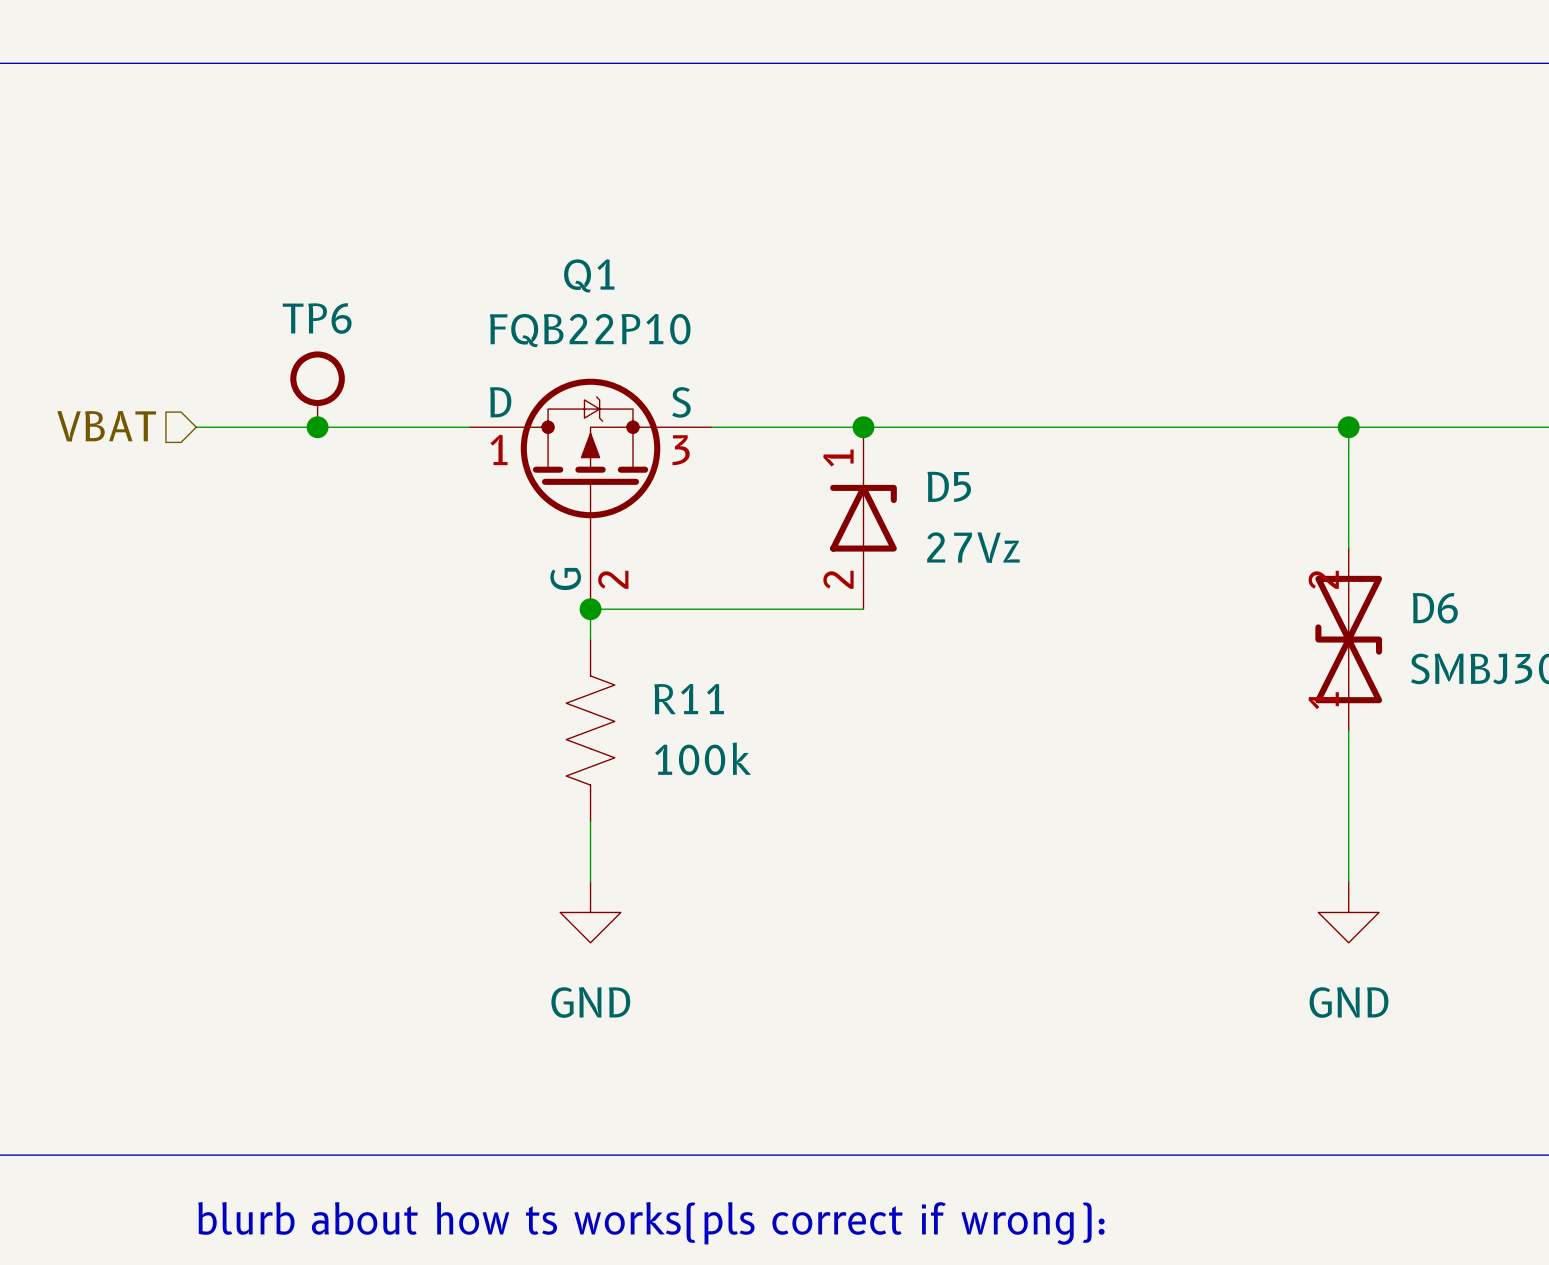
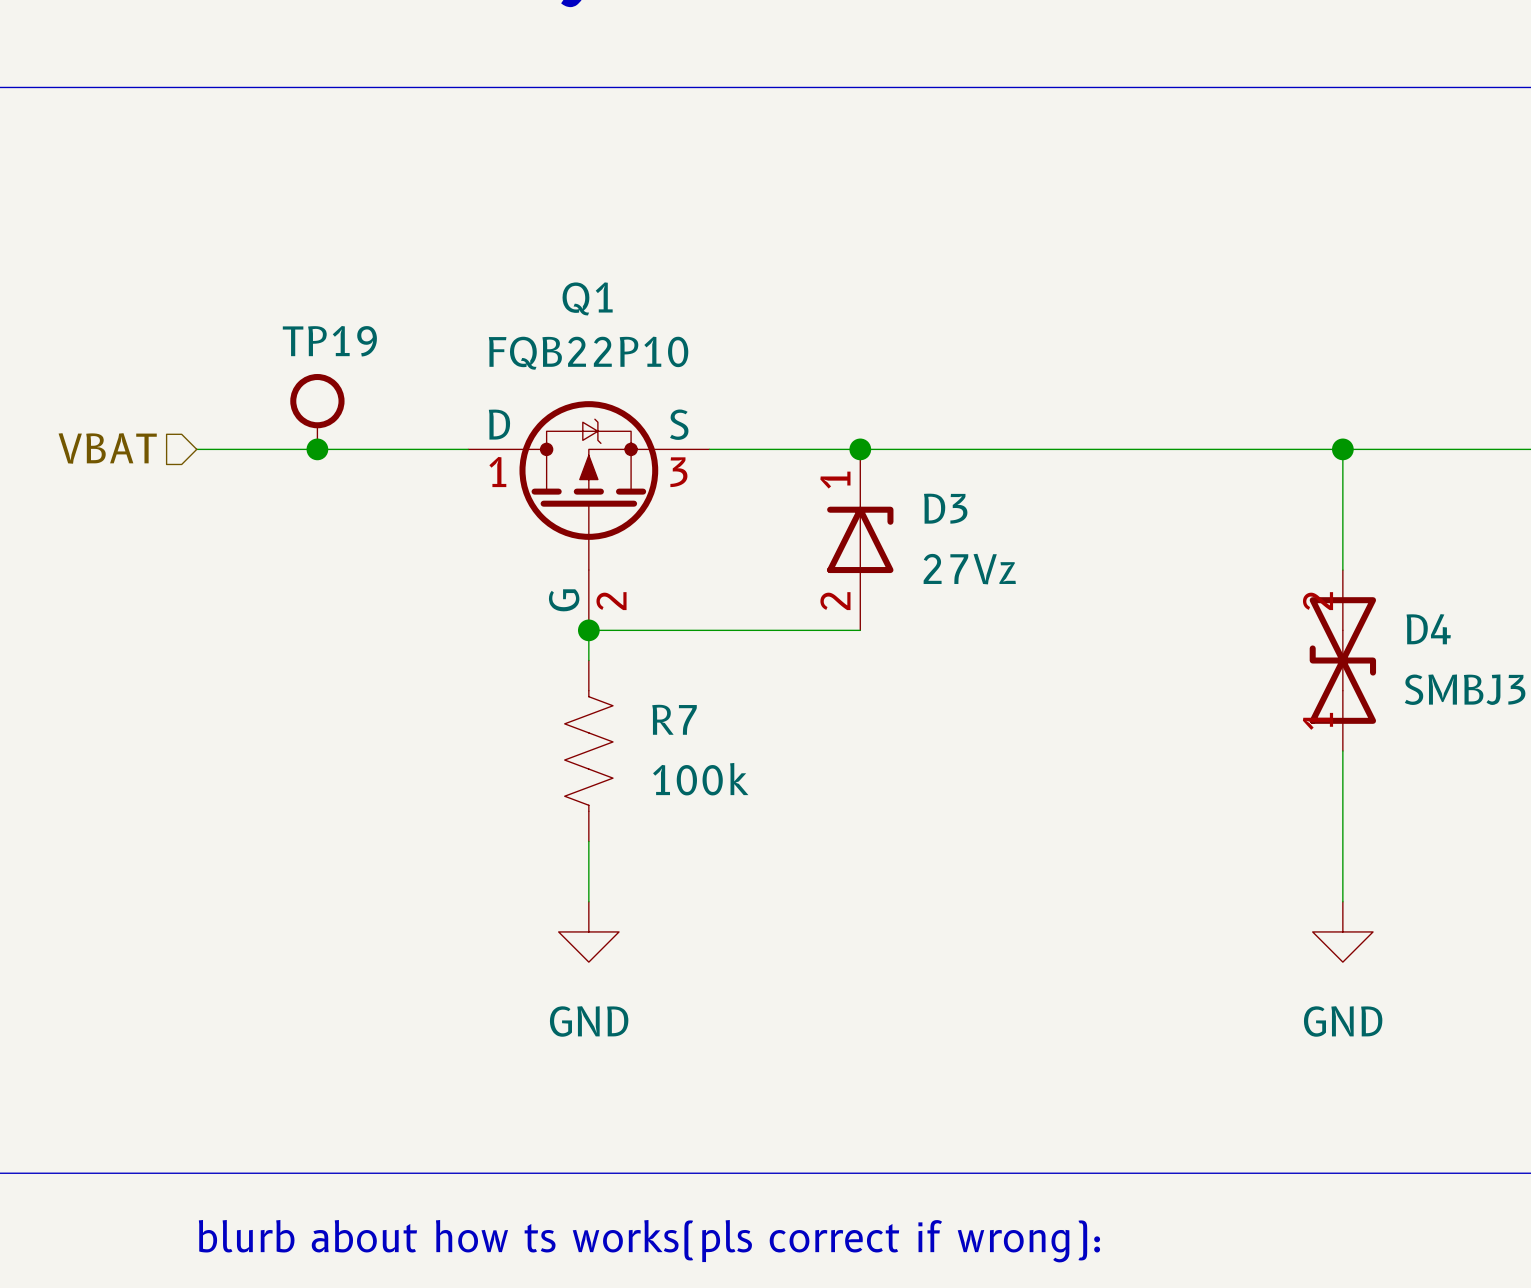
TP6 name: TP6 (317, 318) -> TP19 (329, 341)
D5 name: D5 (949, 486) -> D3 (945, 508)
D6 name: D6 (1435, 608) -> D4 (1428, 629)
R11 name: R11 (689, 699) -> R7 (674, 719)

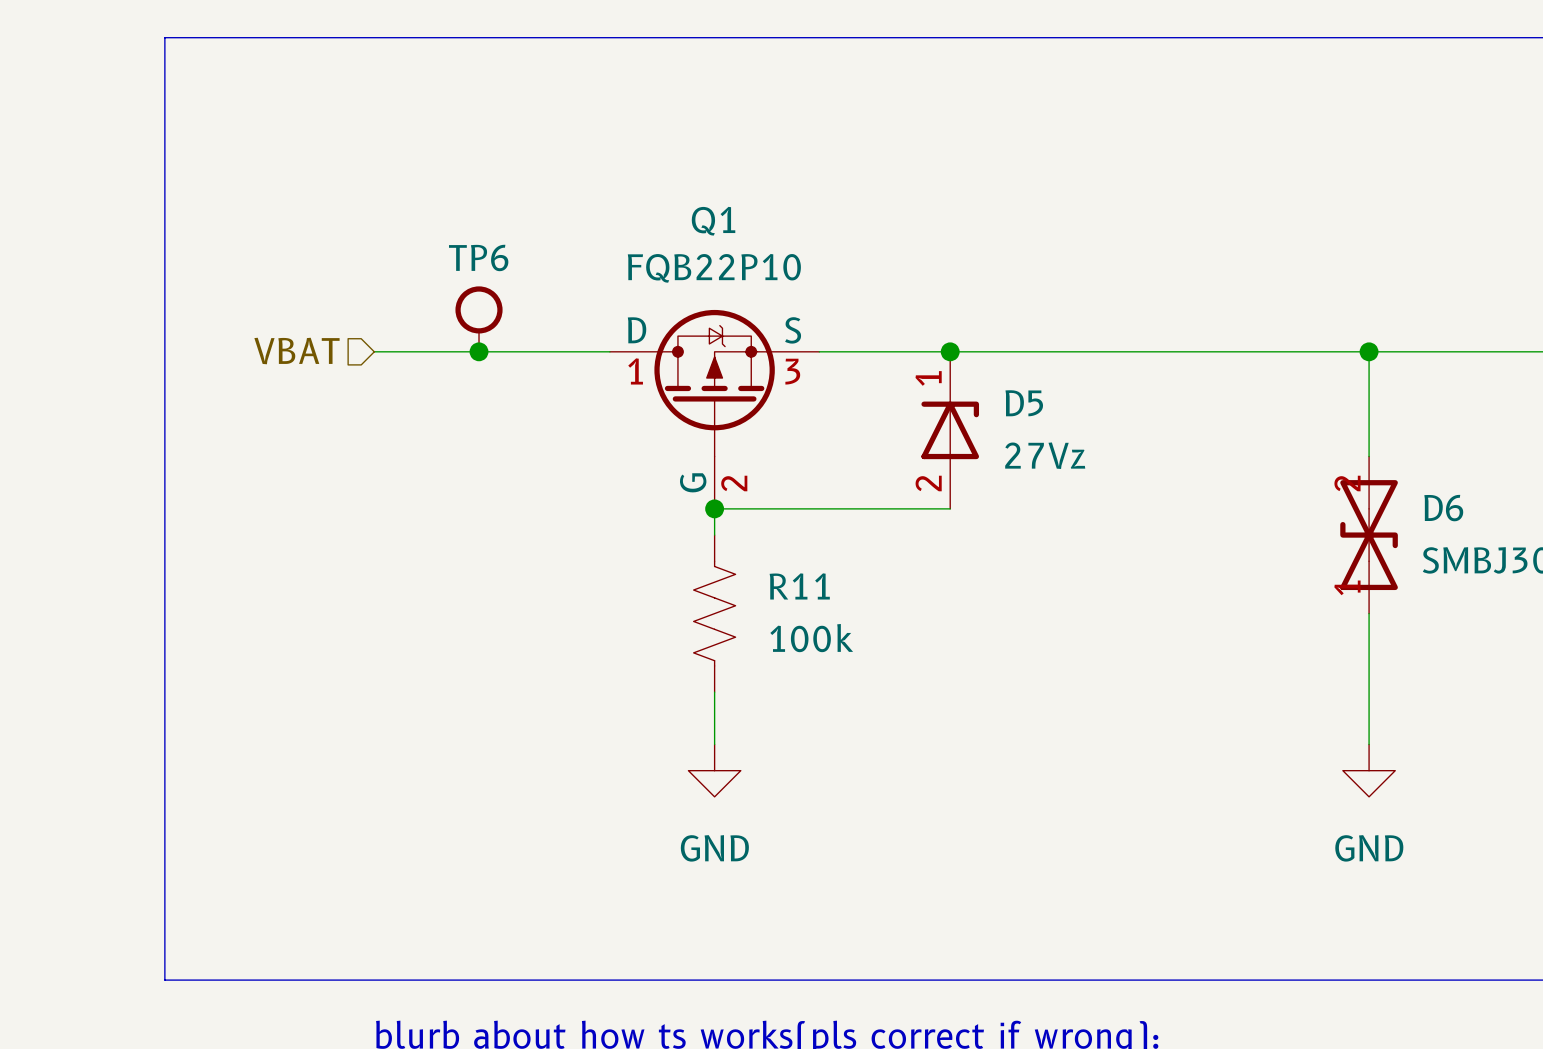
TP19 name: TP19 (329, 341) -> TP6 (478, 257)
D3 name: D3 (945, 508) -> D5 (1024, 403)
D4 name: D4 (1428, 629) -> D6 (1443, 508)
R7 name: R7 (674, 719) -> R11 (799, 586)

